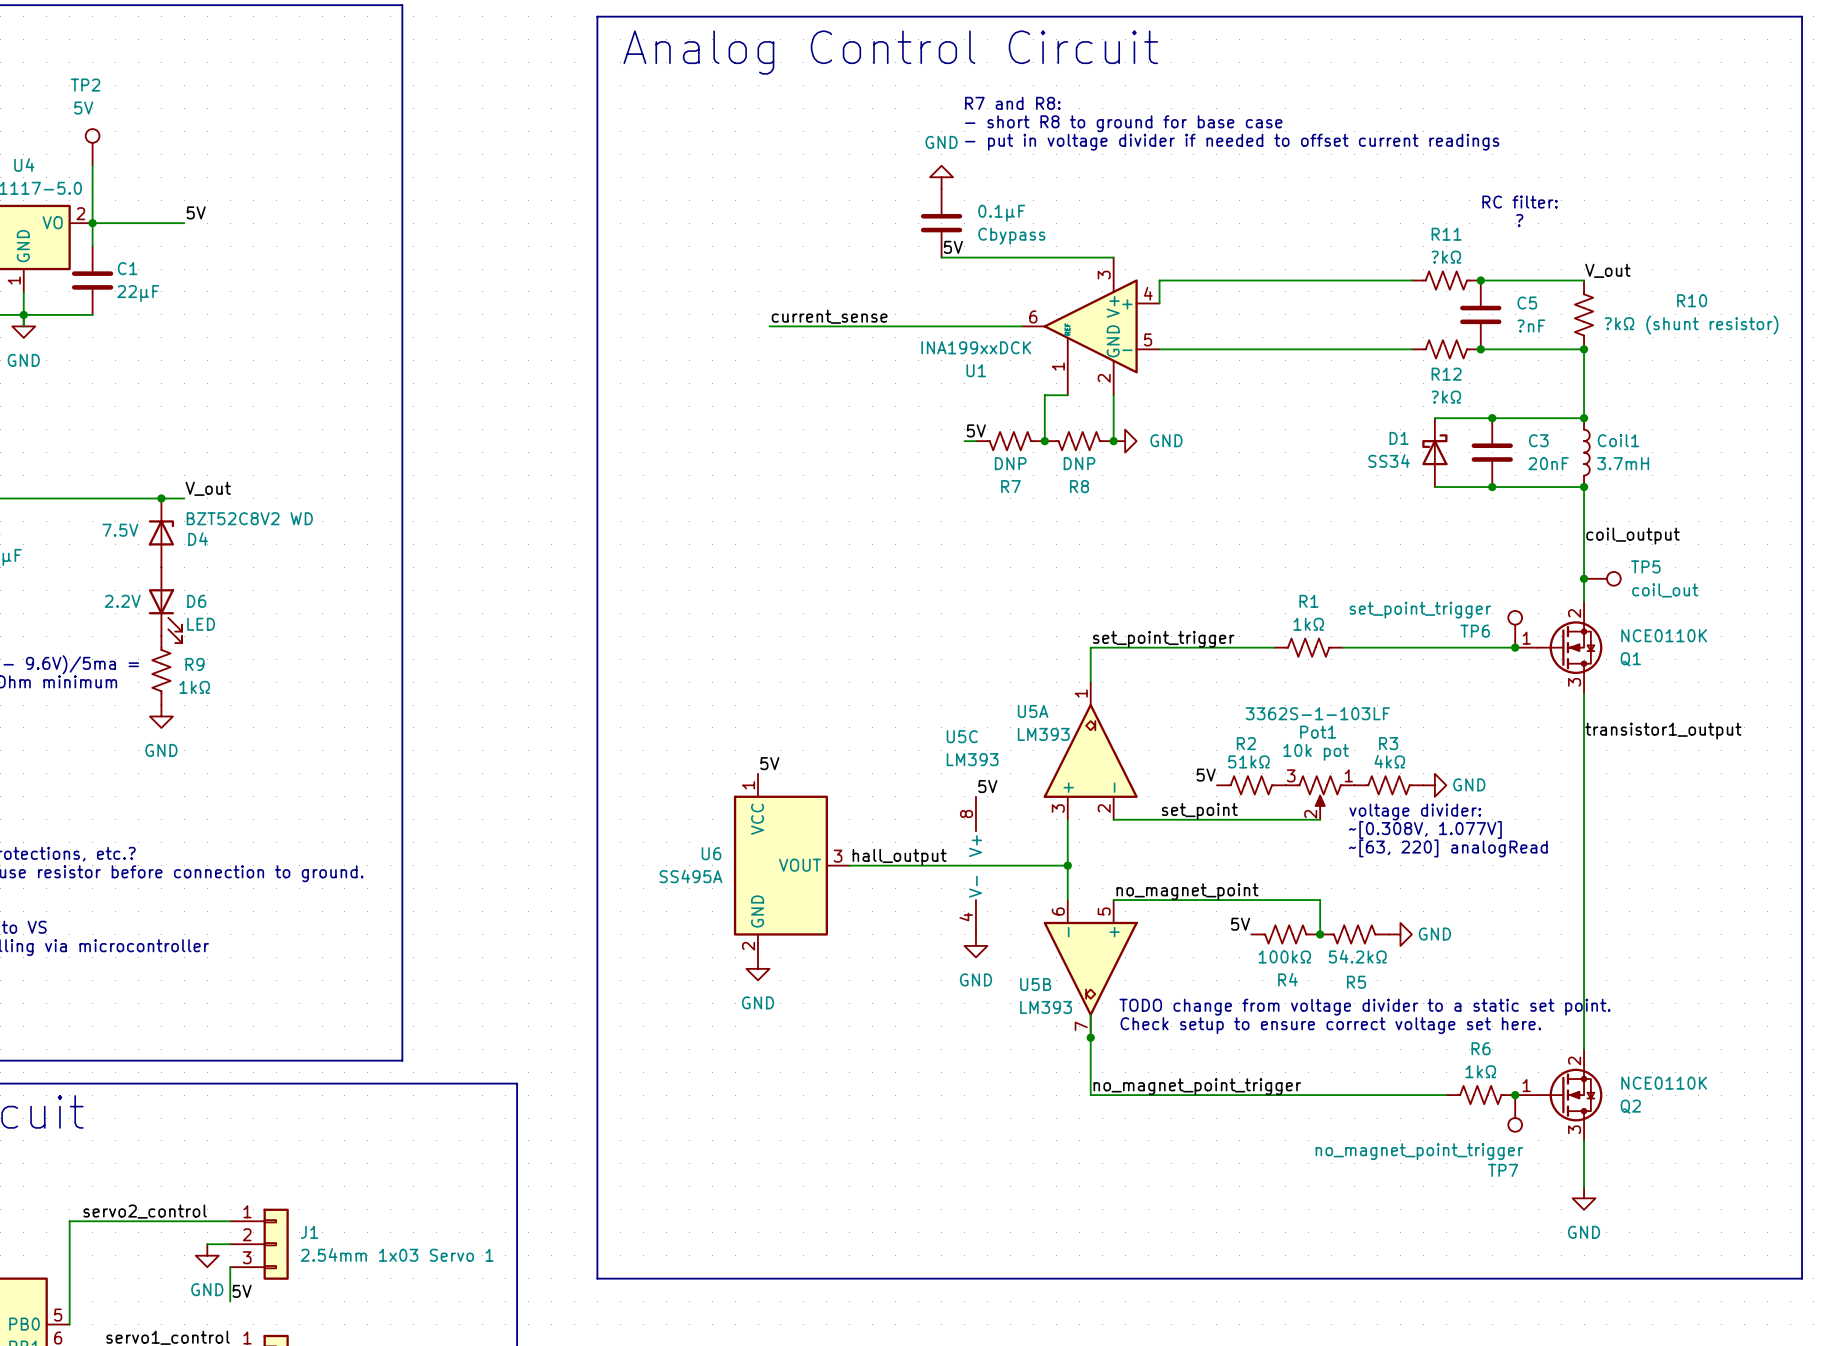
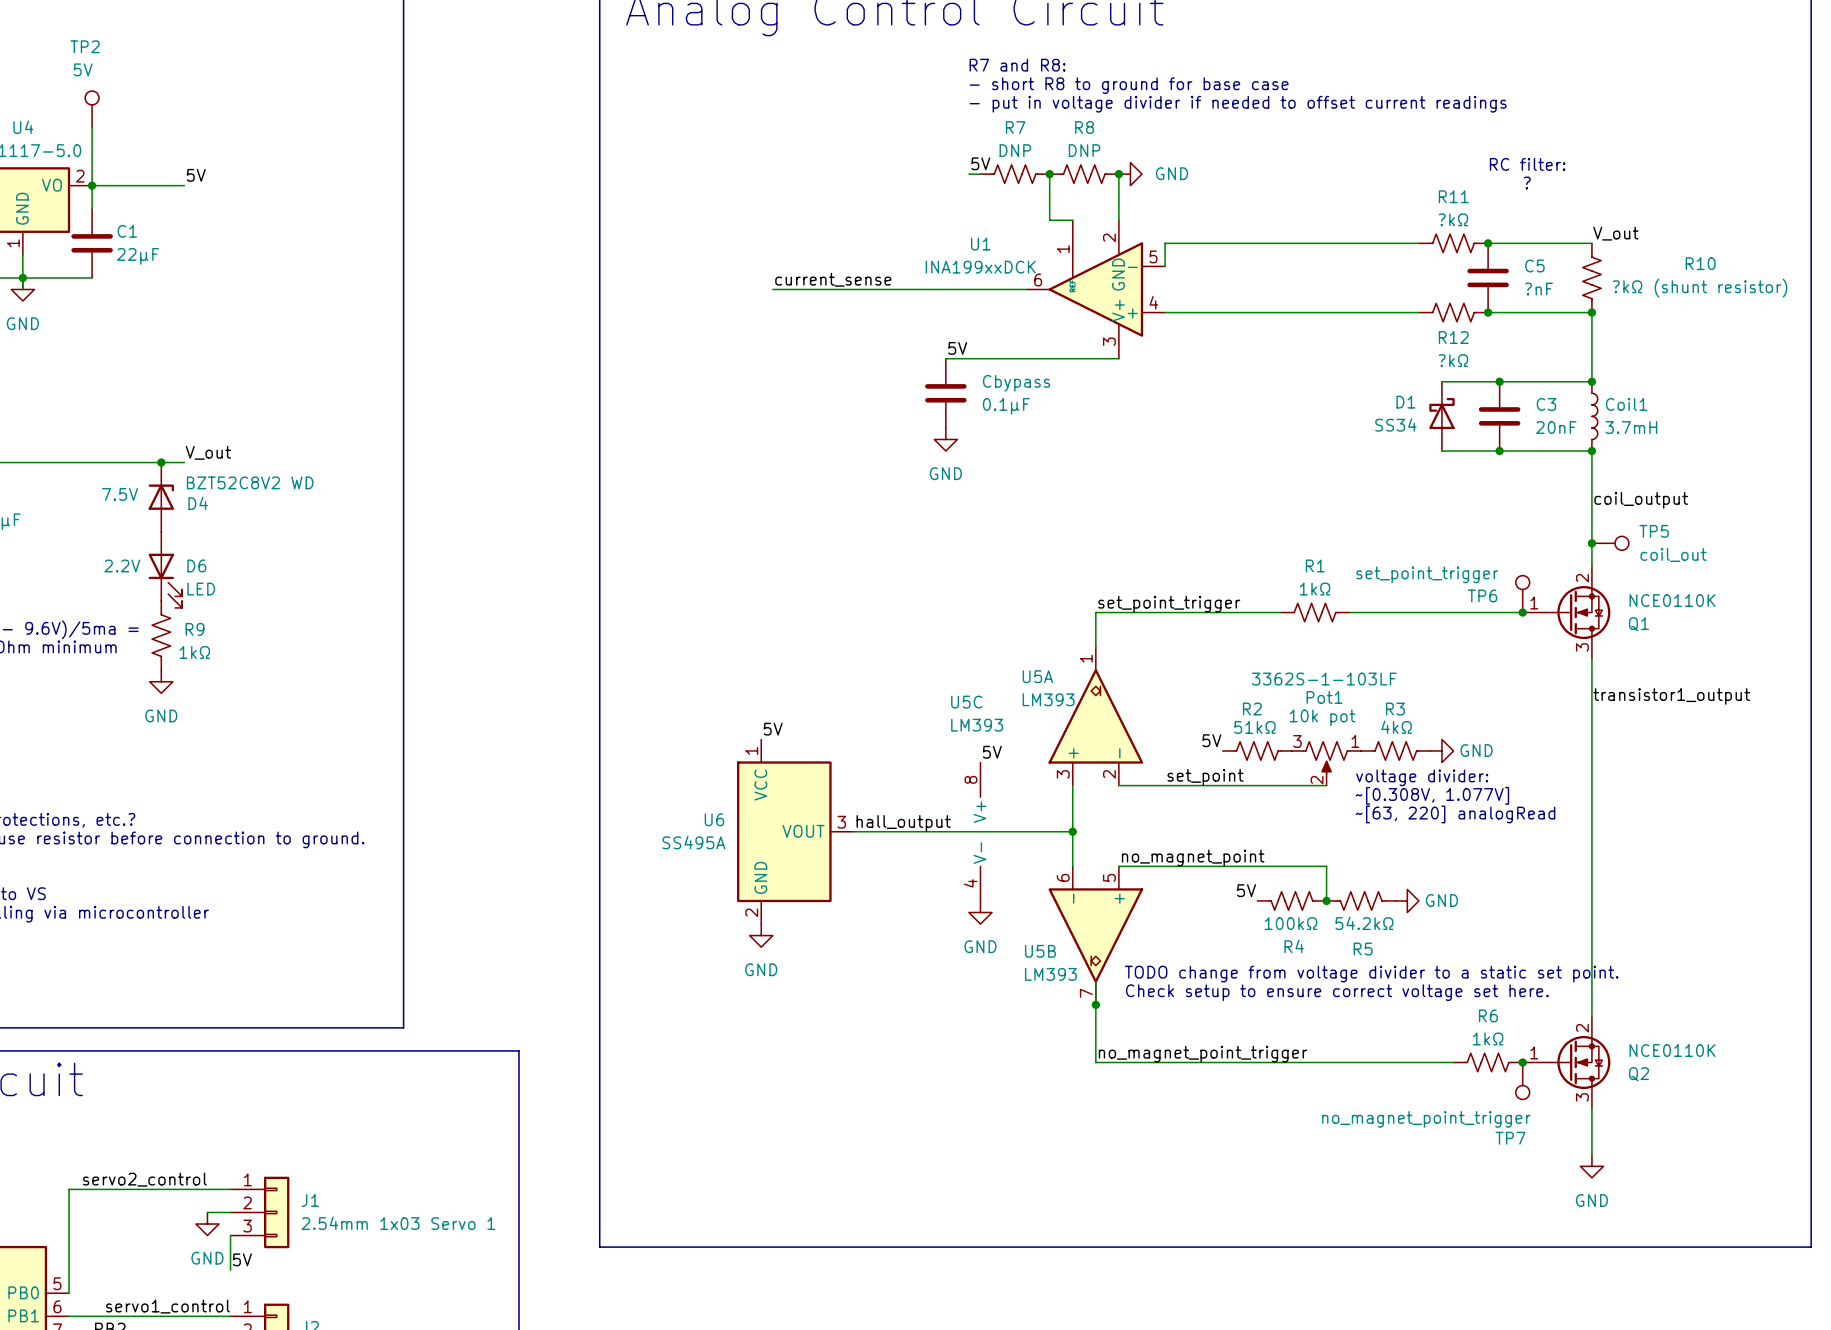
power symbol: GND (941, 177) -> none
wire: none -> (968, 174) (980, 174)
junction: none -> (1049, 174)
junction: none -> (1118, 174)
power symbol: none -> GND (1130, 174)
Cbypass value position: 0.1µF (1001, 213) -> 0.1µF (1006, 406)
Cbypass position: (941, 223) -> (945, 393)
Cbypass name position: Cbypass (1011, 236) -> Cbypass (1016, 383)
label position: 5V (953, 247) -> 5V (980, 163)
wire: (941, 257) (1044, 257) -> (1049, 174) (1049, 220)
wire: (1067, 257) (1113, 257) -> (1118, 174) (1118, 220)
U1 flip: as is (1090, 326) -> up-down (1095, 289)
wire: (1044, 395) (1044, 441) -> (1049, 358) (945, 358)
wire: (1113, 395) (1113, 441) -> (1118, 358) (1072, 358)
label position: 5V (976, 430) -> 5V (957, 348)
wire: (964, 441) (975, 441) -> none
R7 flip: as is (1010, 441) -> left-right (1015, 174)
R7 position: (1010, 441) -> (1015, 174)
junction: (1044, 441) -> none
R8 flip: as is (1079, 441) -> left-right (1084, 174)
R8 position: (1079, 441) -> (1084, 174)
junction: (1113, 441) -> none
power symbol: GND (1125, 441) -> none
R7 value position: DNP (1010, 463) -> DNP (1015, 150)
R8 value position: DNP (1079, 463) -> DNP (1084, 150)
power symbol: none -> GND (945, 439)
R7 name position: R7 (1010, 486) -> R7 (1015, 127)
R8 name position: R8 (1079, 486) -> R8 (1084, 127)

